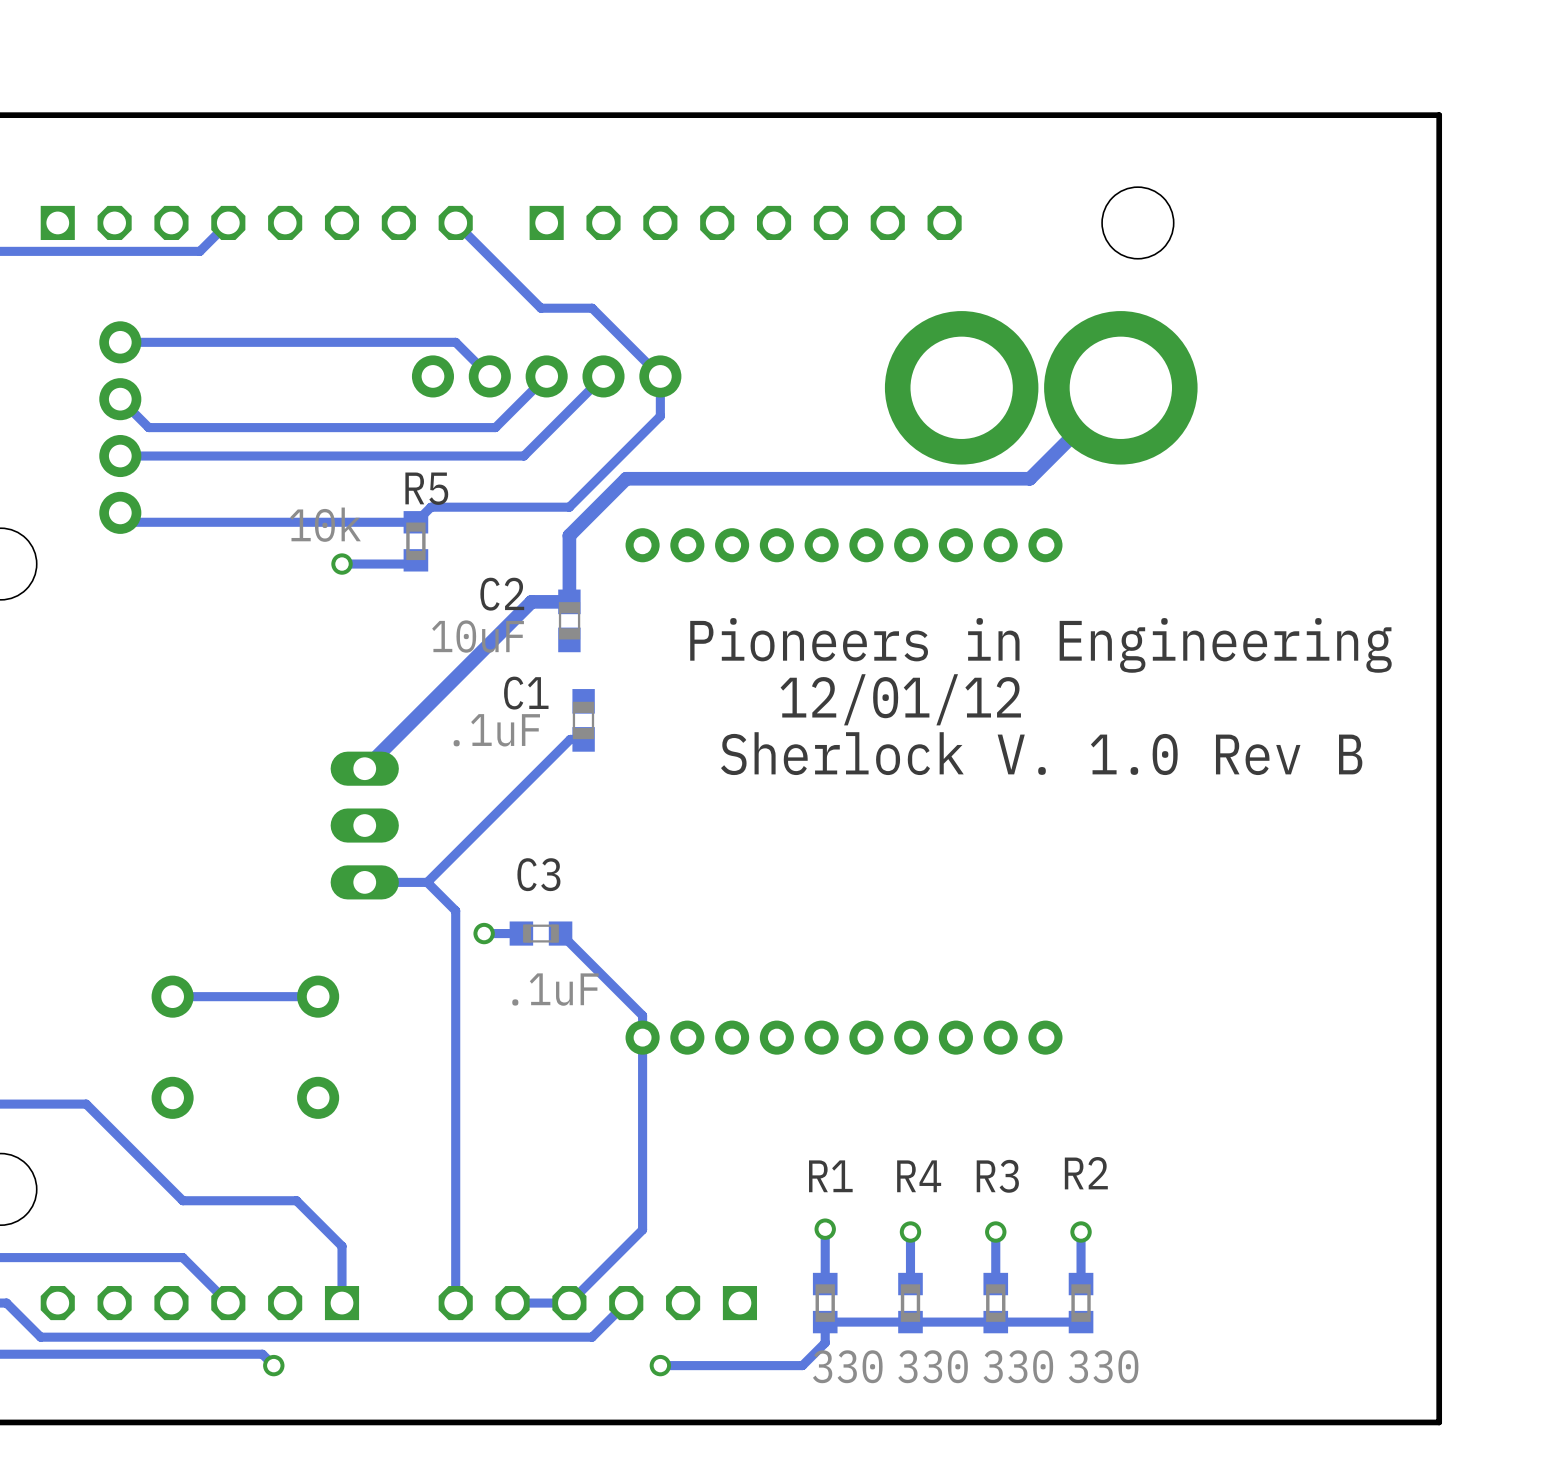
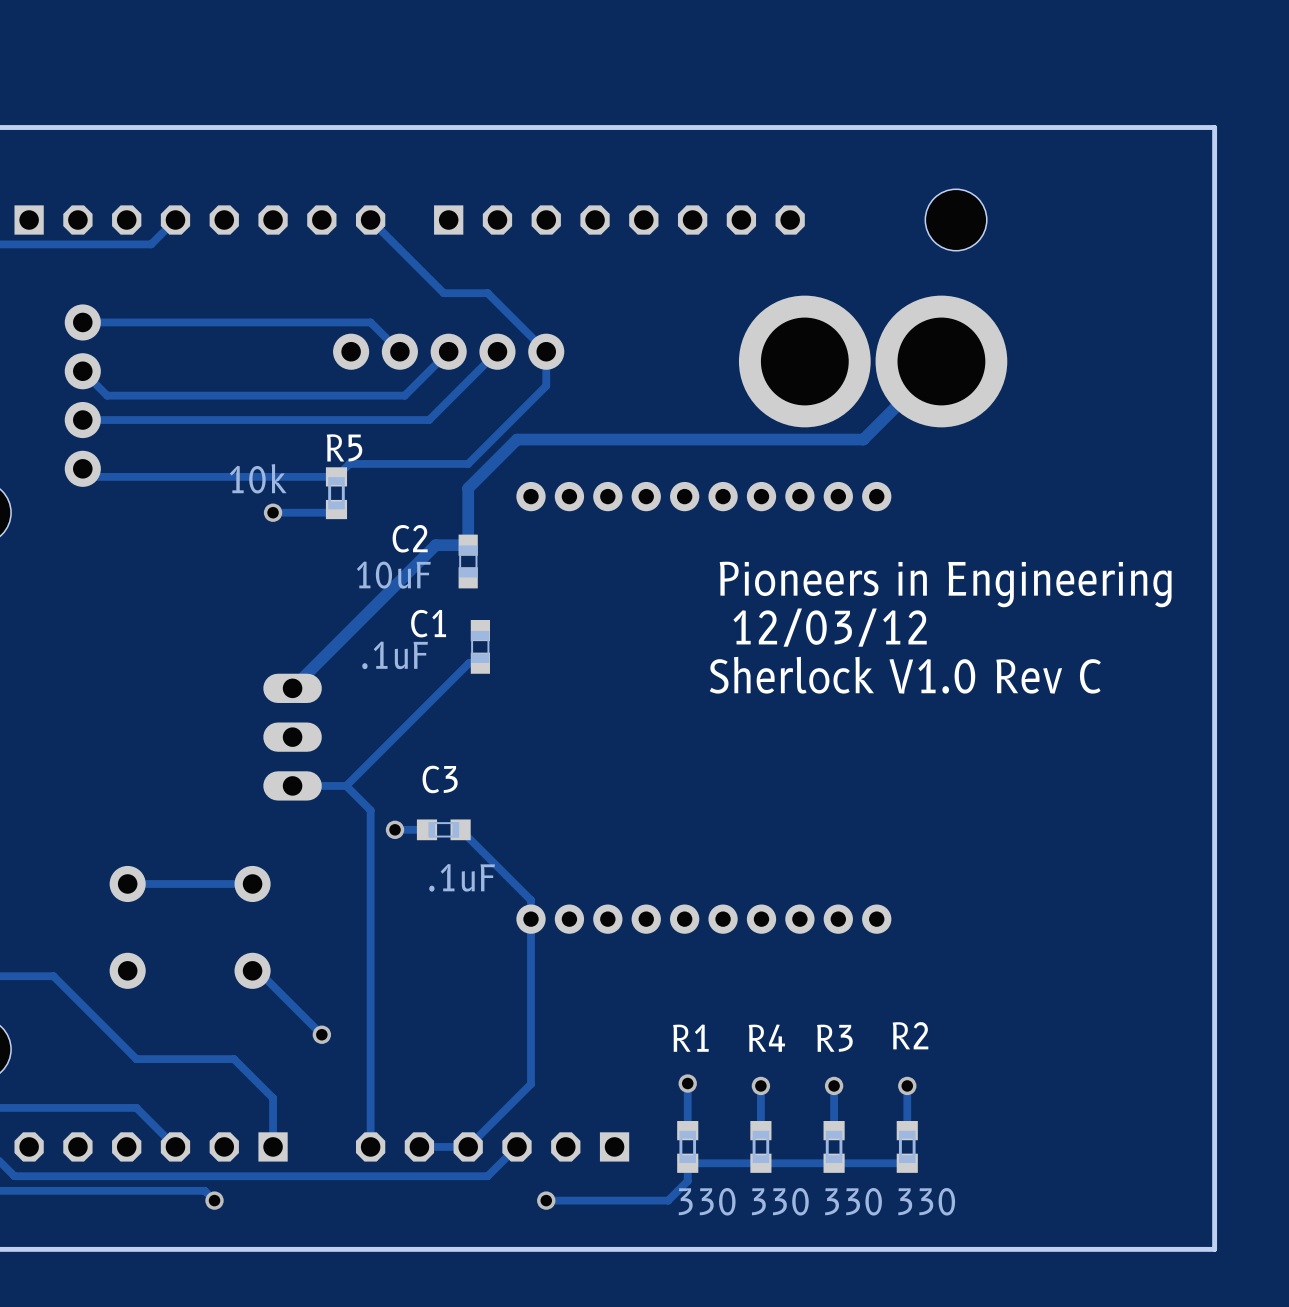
text: 12/01/12 (900, 699) -> 12/03/12 (830, 627)
text: Sherlock V. 1.0 Rev B (1041, 753) -> Sherlock V1.0 Rev C (905, 675)
track: none -> (252, 970) (257, 970) (321, 1034)
via: none -> (321, 1034)

